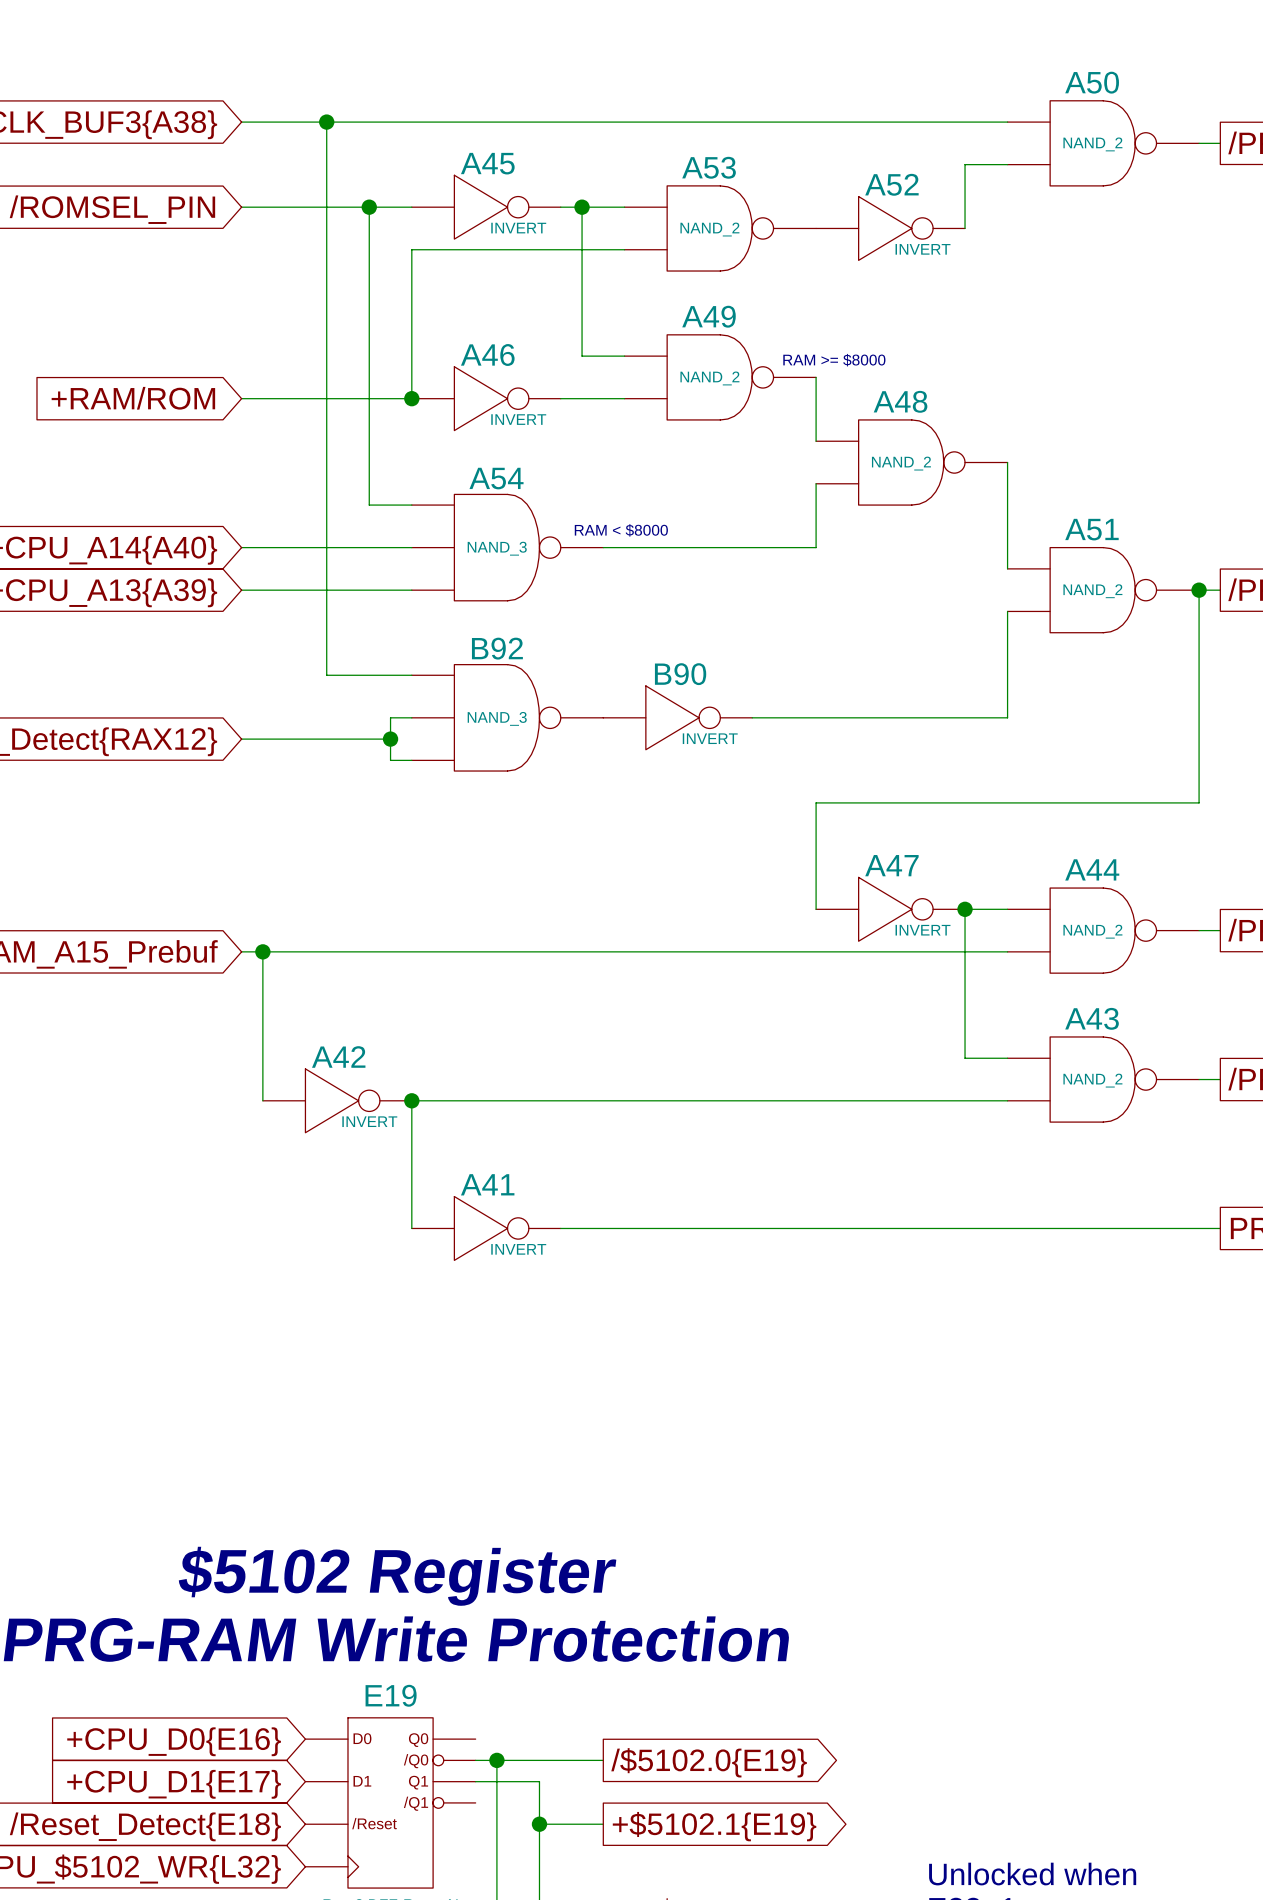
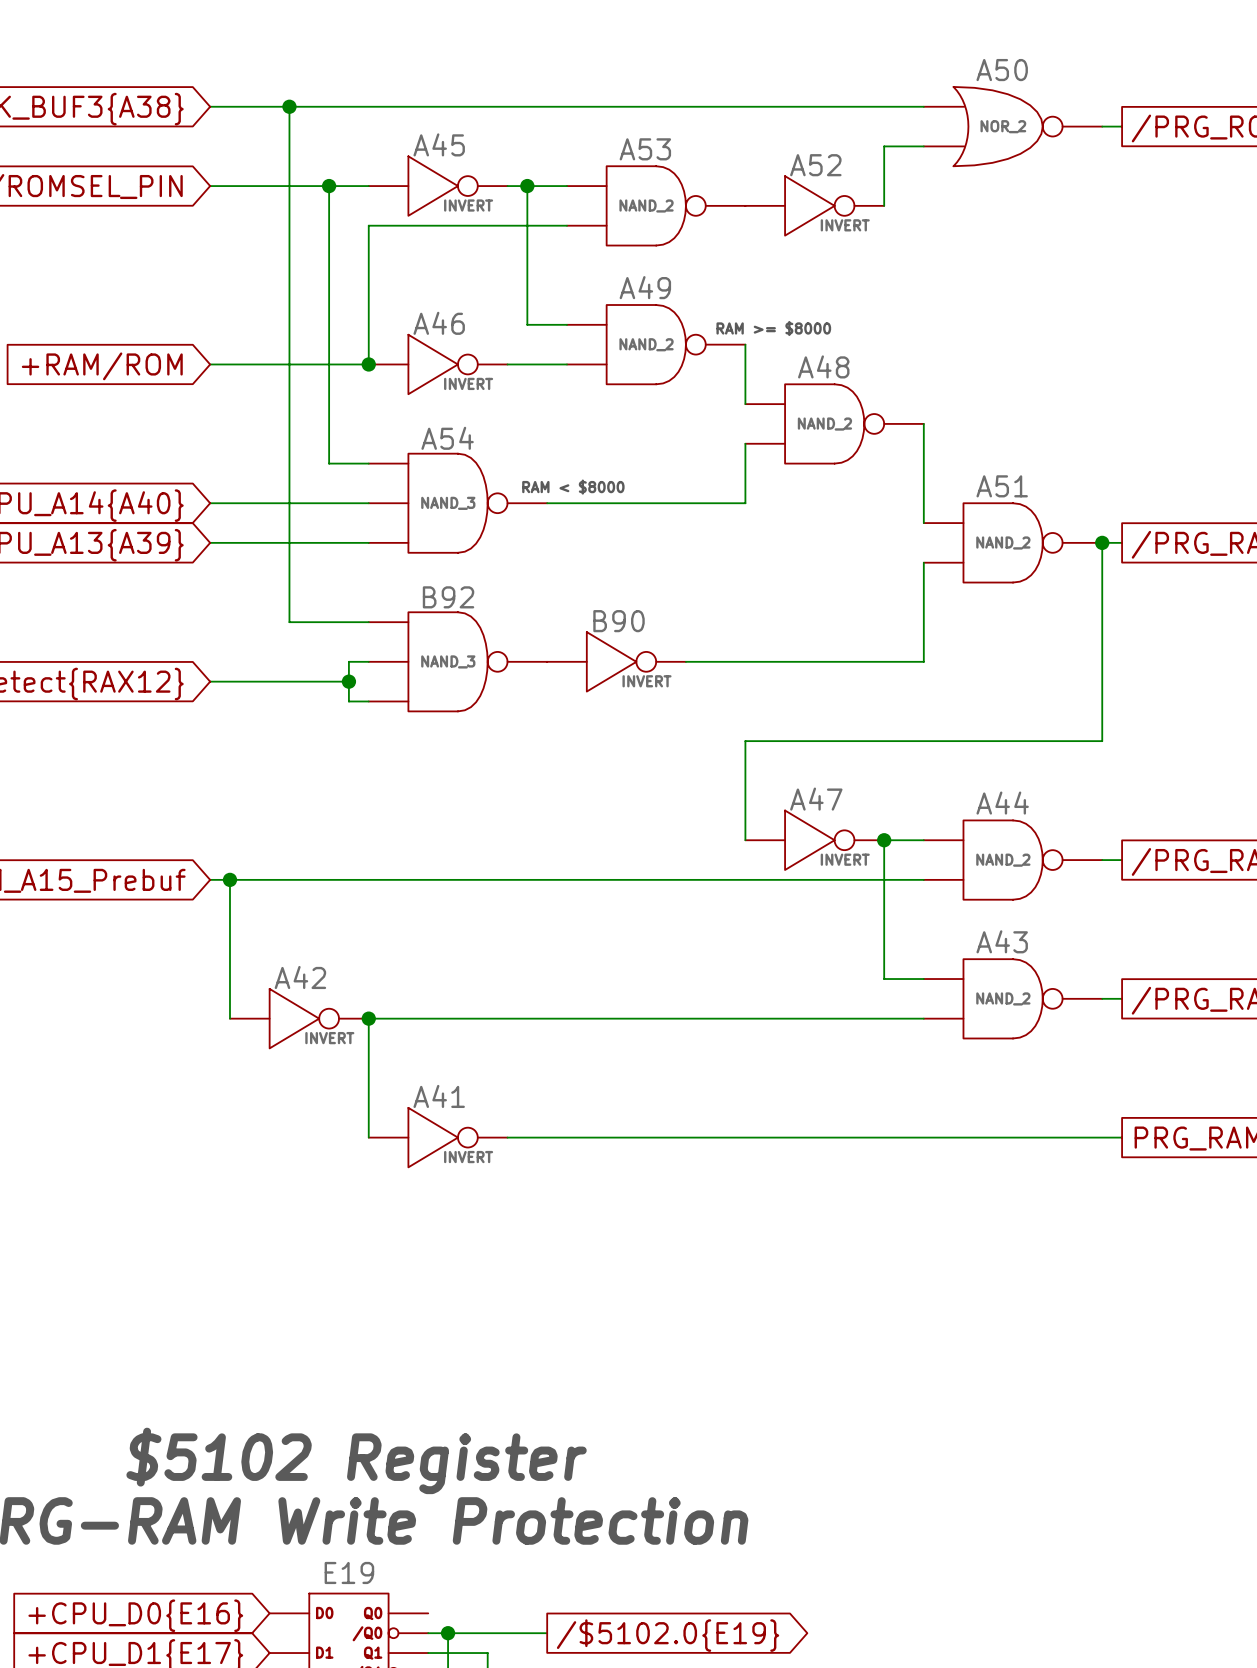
A50 symbol: [1007, 100, 1200, 186] -> [923, 86, 1103, 167]
A50 value: NAND_2 (1092, 144) -> NOR_2 (1003, 126)

